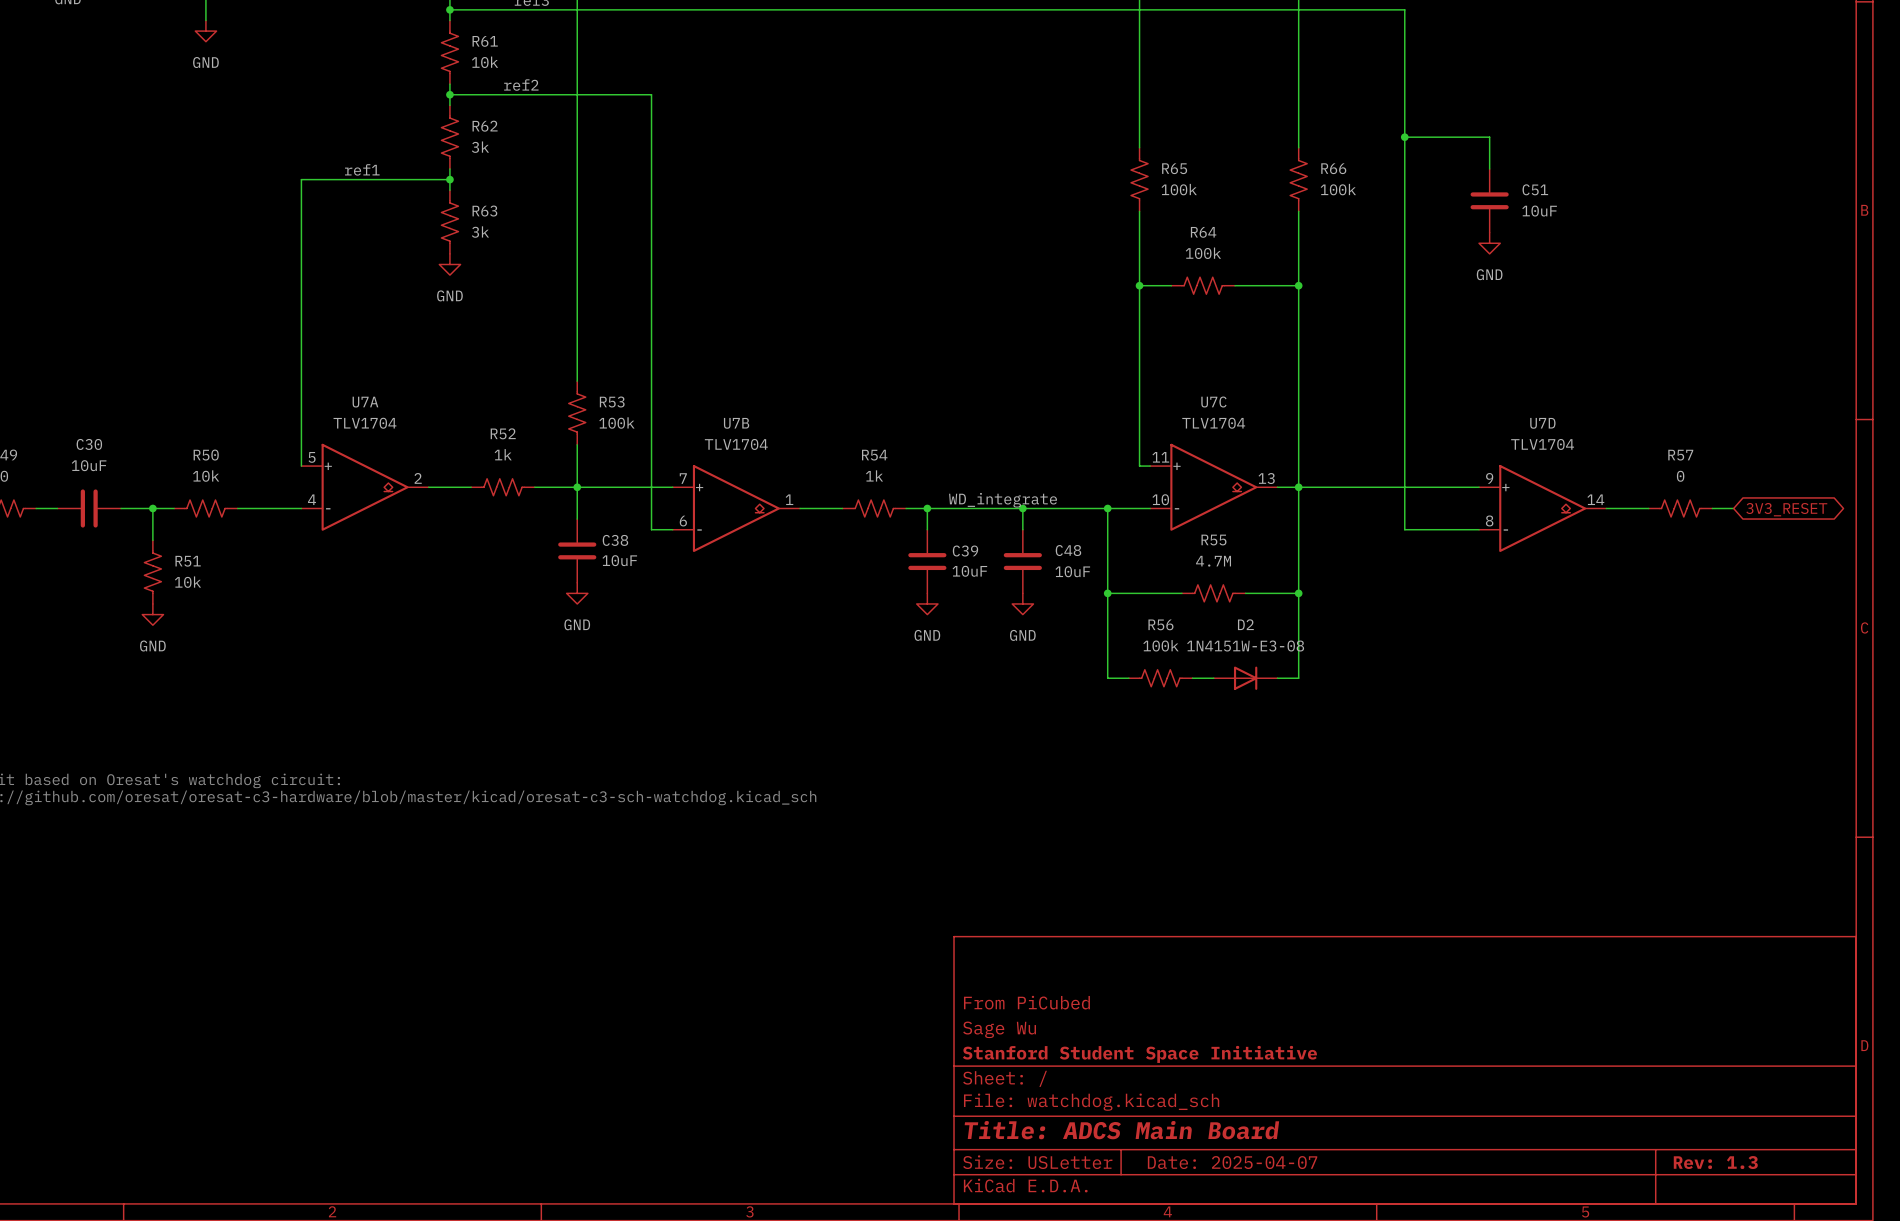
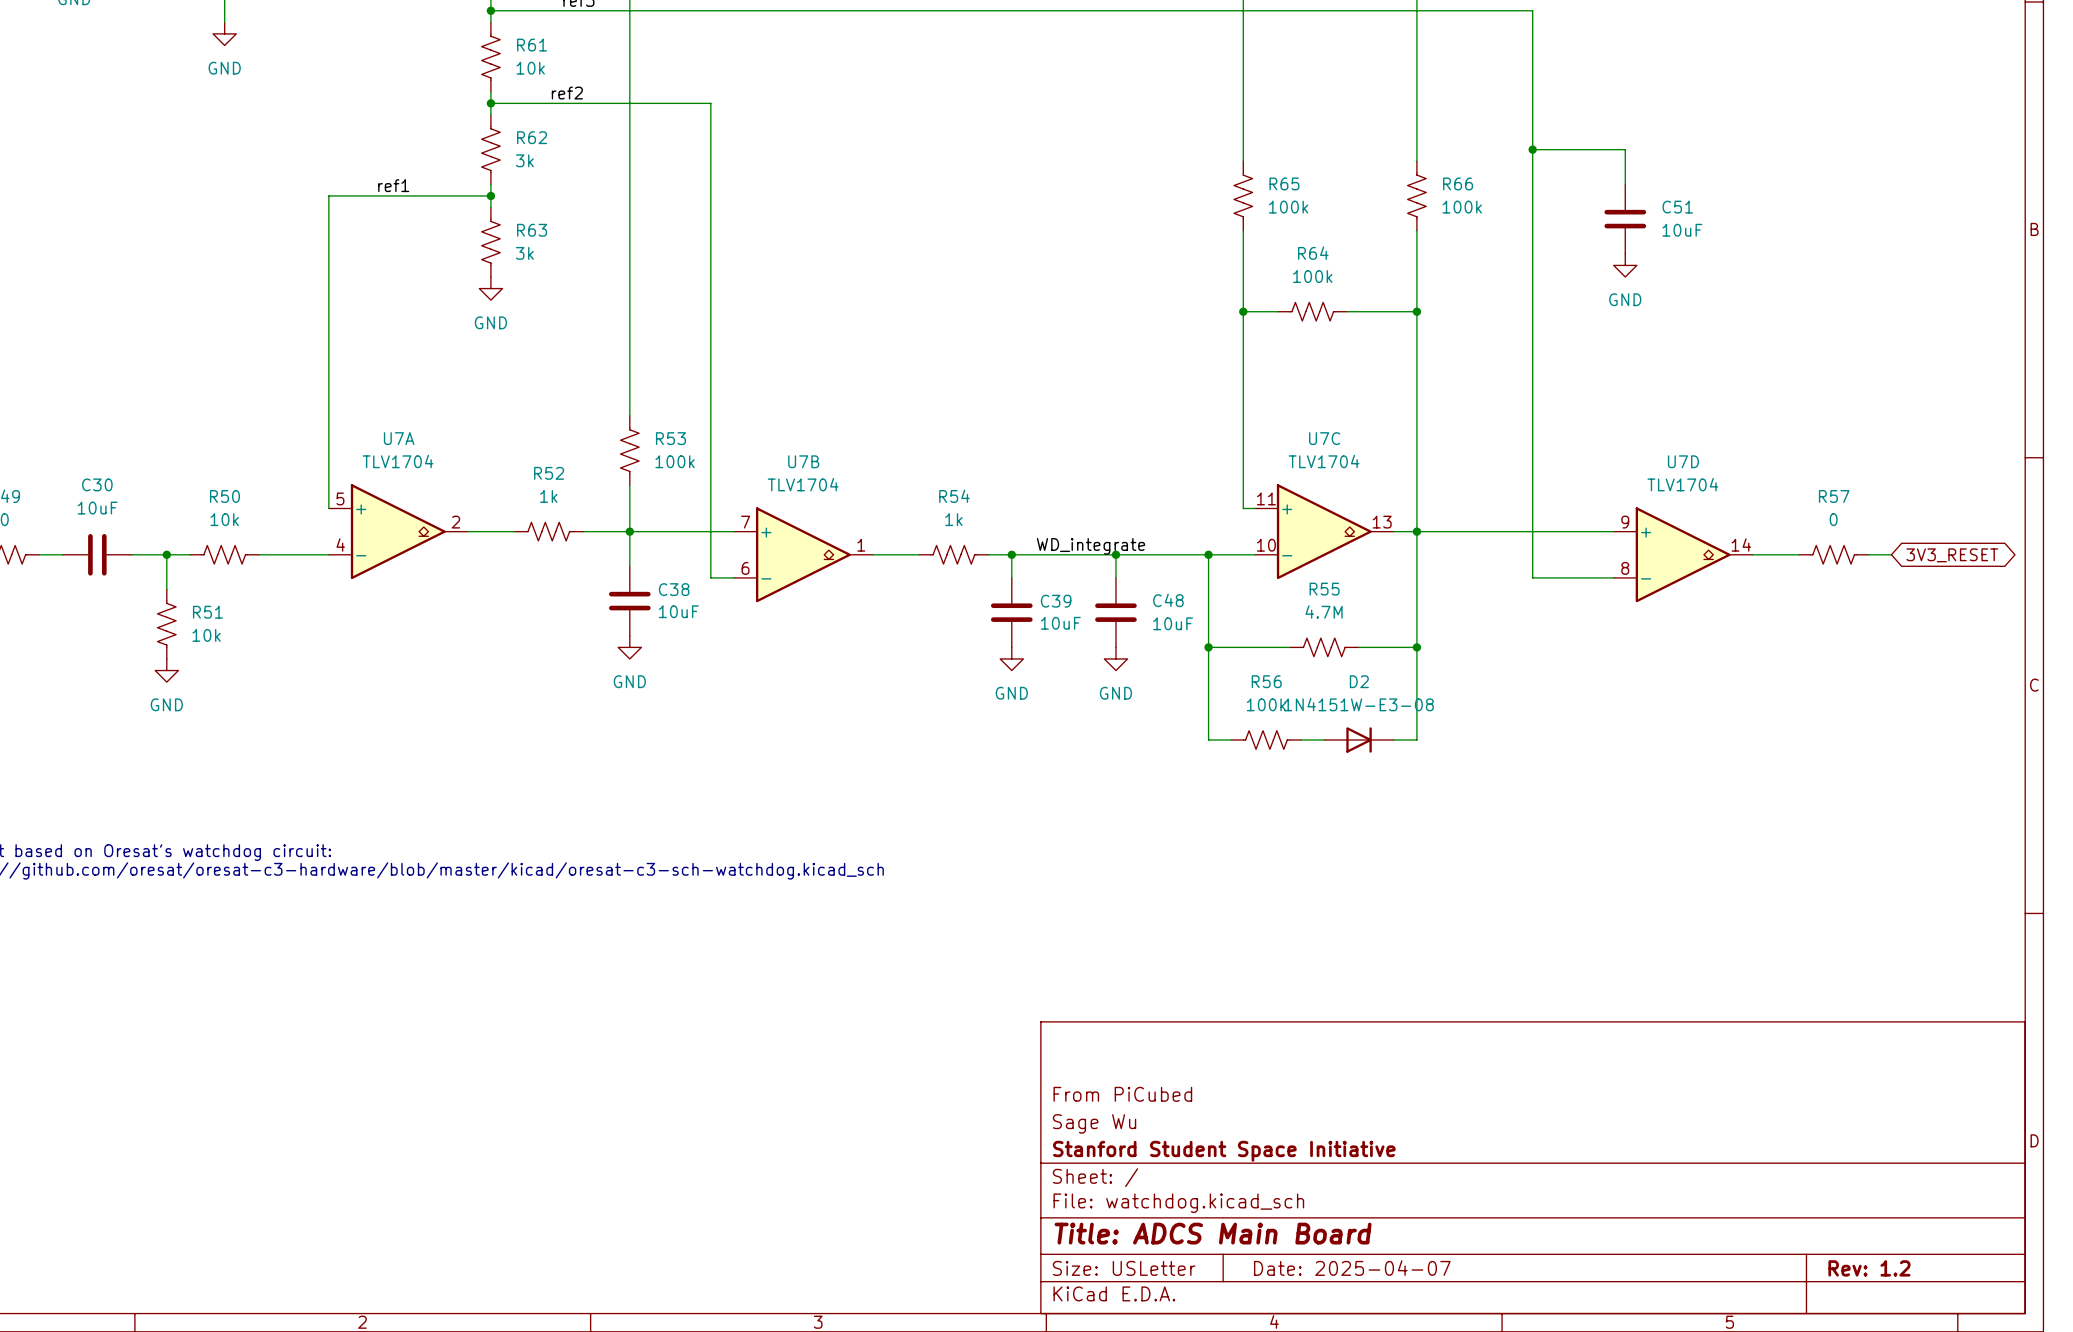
title block: Rev: 1.3 (1715, 1162) -> Rev: 1.2 (1869, 1268)

